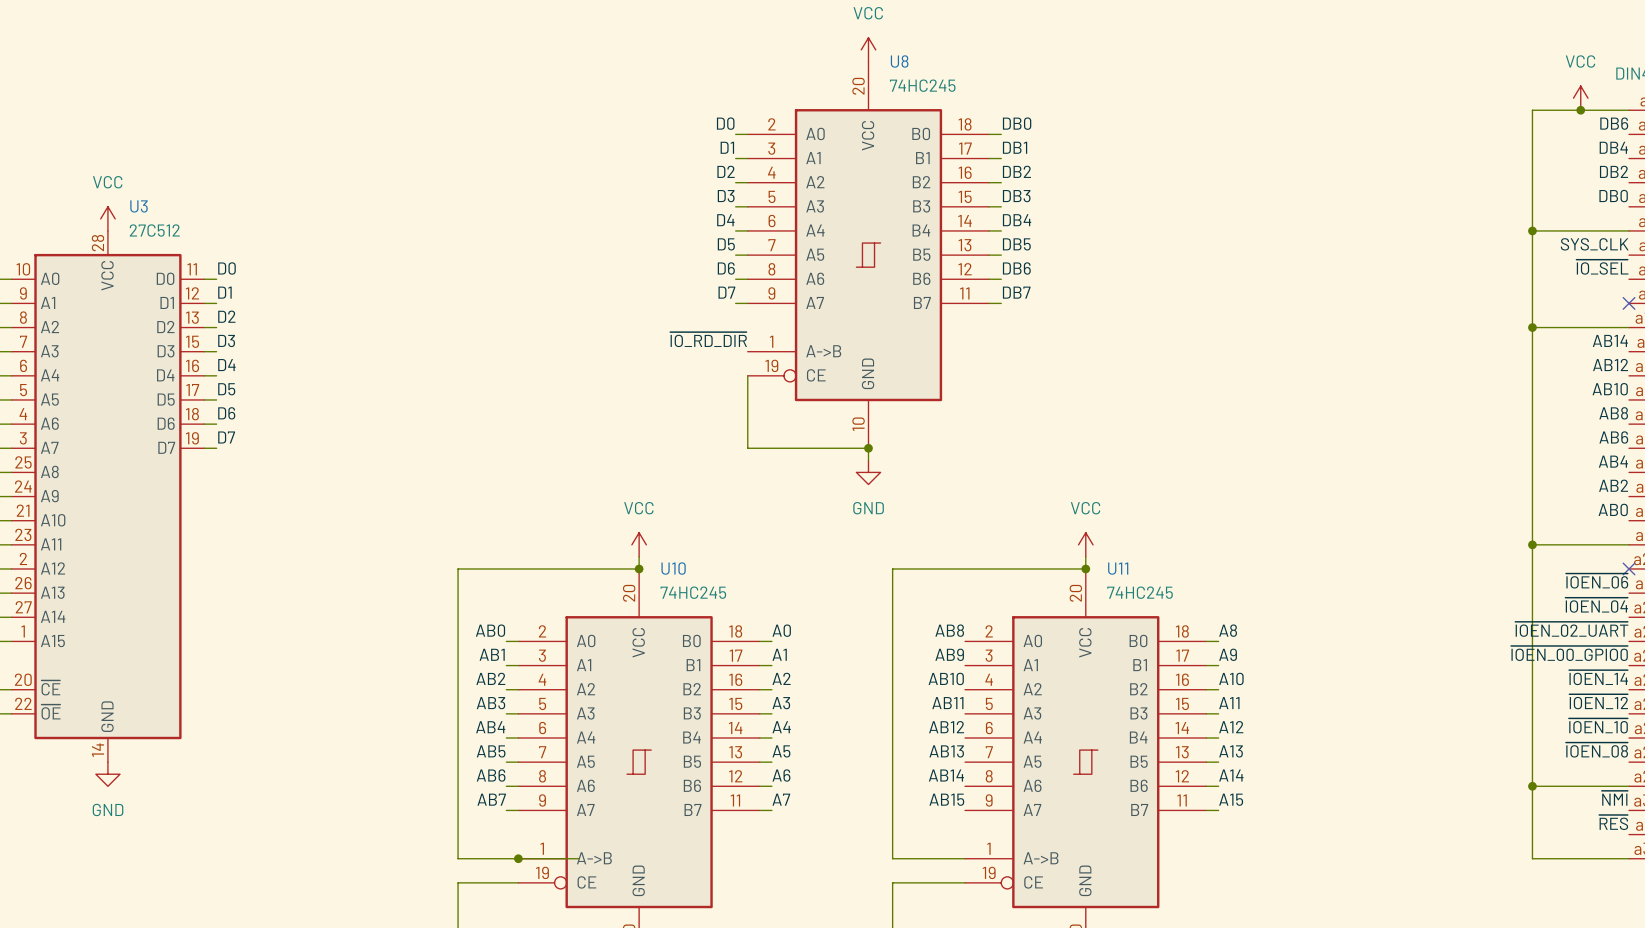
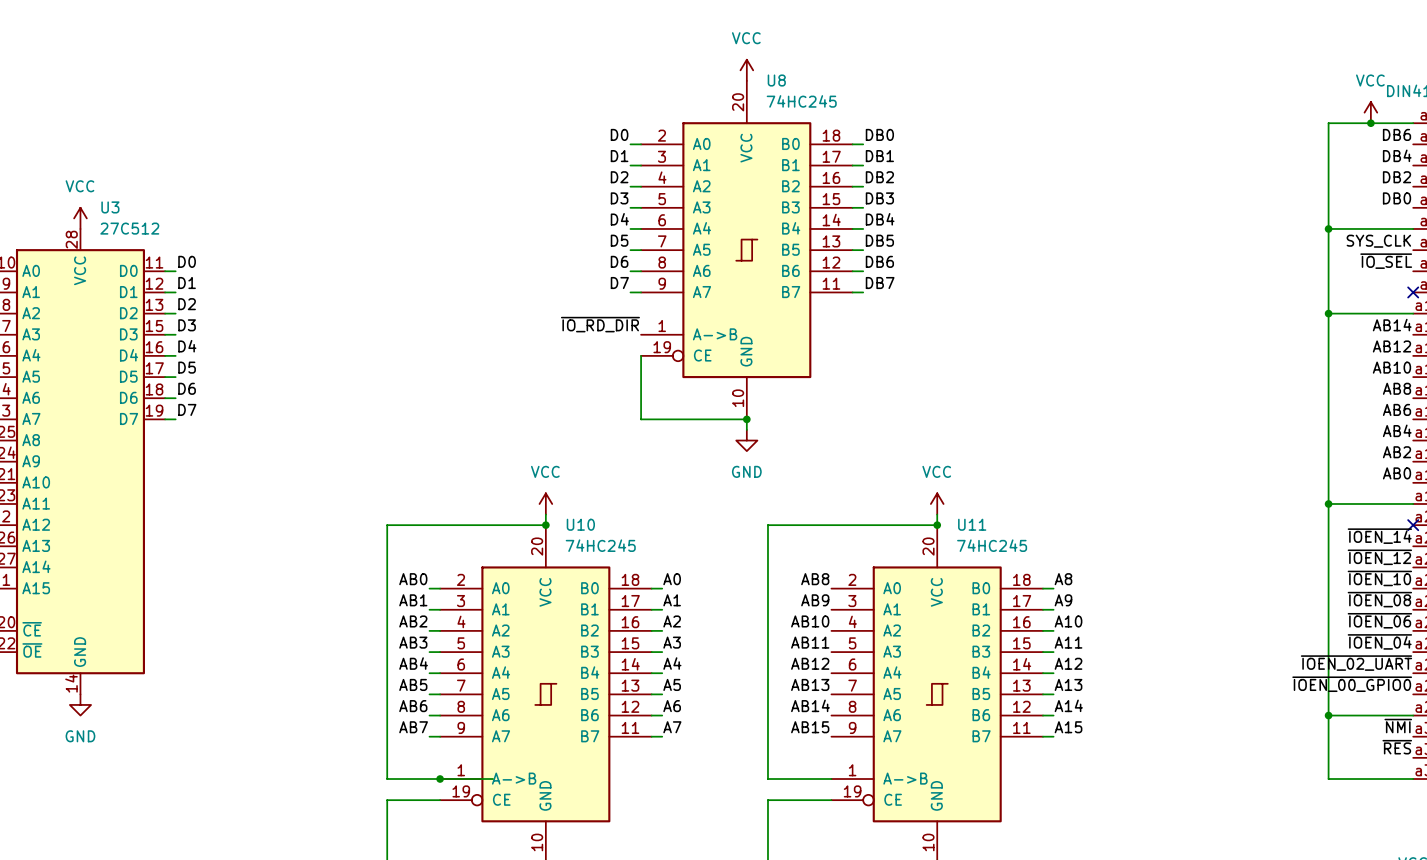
label: ~{IOEN_06} (1597, 581) -> ~{IOEN_14} (1379, 536)
label: ~{IOEN_04} (1596, 605) -> ~{IOEN_12} (1379, 557)
label: ~{IOEN_02_UART} (1571, 629) -> ~{IOEN_10} (1379, 578)
label: ~{IOEN_00_GPIO0} (1569, 653) -> ~{IOEN_08} (1379, 599)
label: ~{IOEN_14} (1598, 677) -> ~{IOEN_06} (1379, 620)
label: ~{IOEN_12} (1598, 701) -> ~{IOEN_04} (1379, 641)
label: ~{IOEN_10} (1598, 725) -> ~{IOEN_02_UART} (1356, 663)
label: ~{IOEN_08} (1596, 750) -> ~{IOEN_00_GPIO0} (1352, 684)

